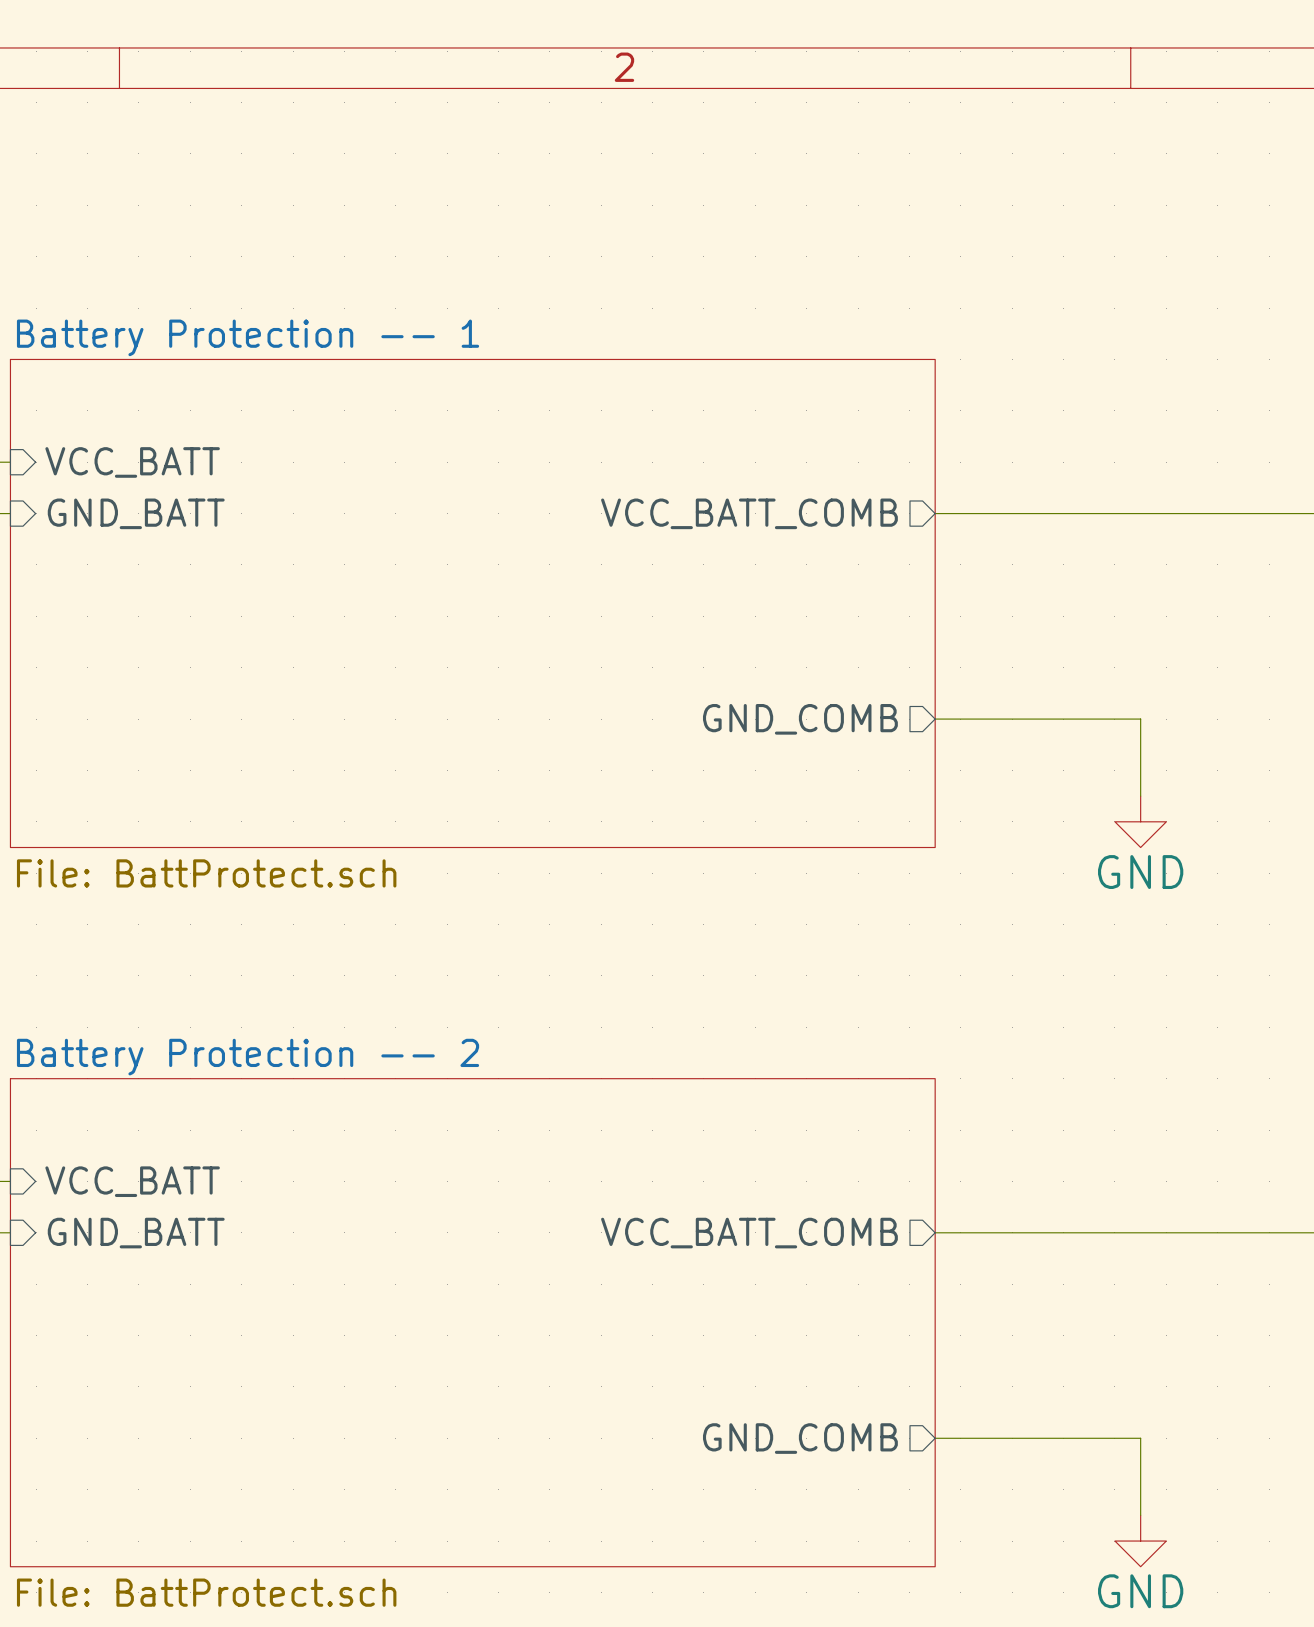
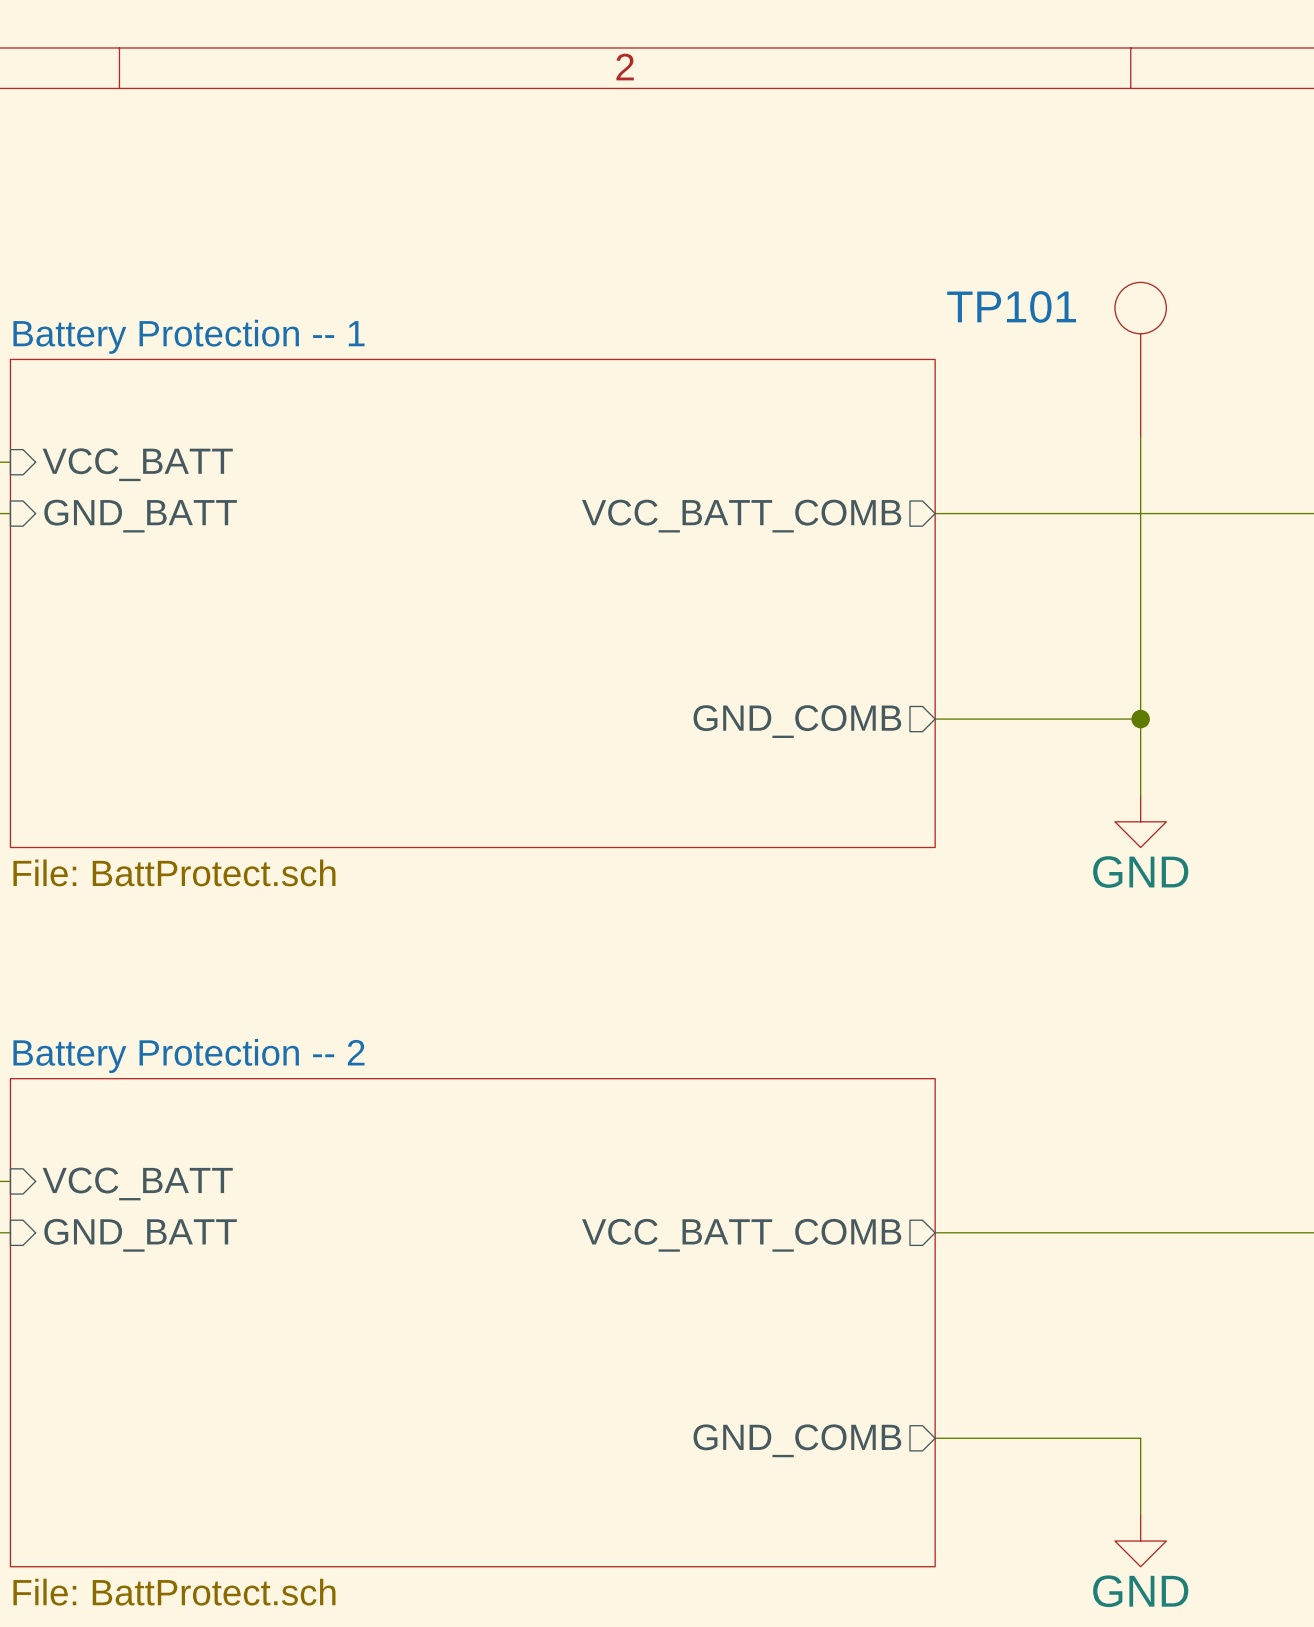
TP101: none -> (1140, 359)
wire: none -> (1140, 436) (1140, 719)
junction: none -> (1140, 719)

